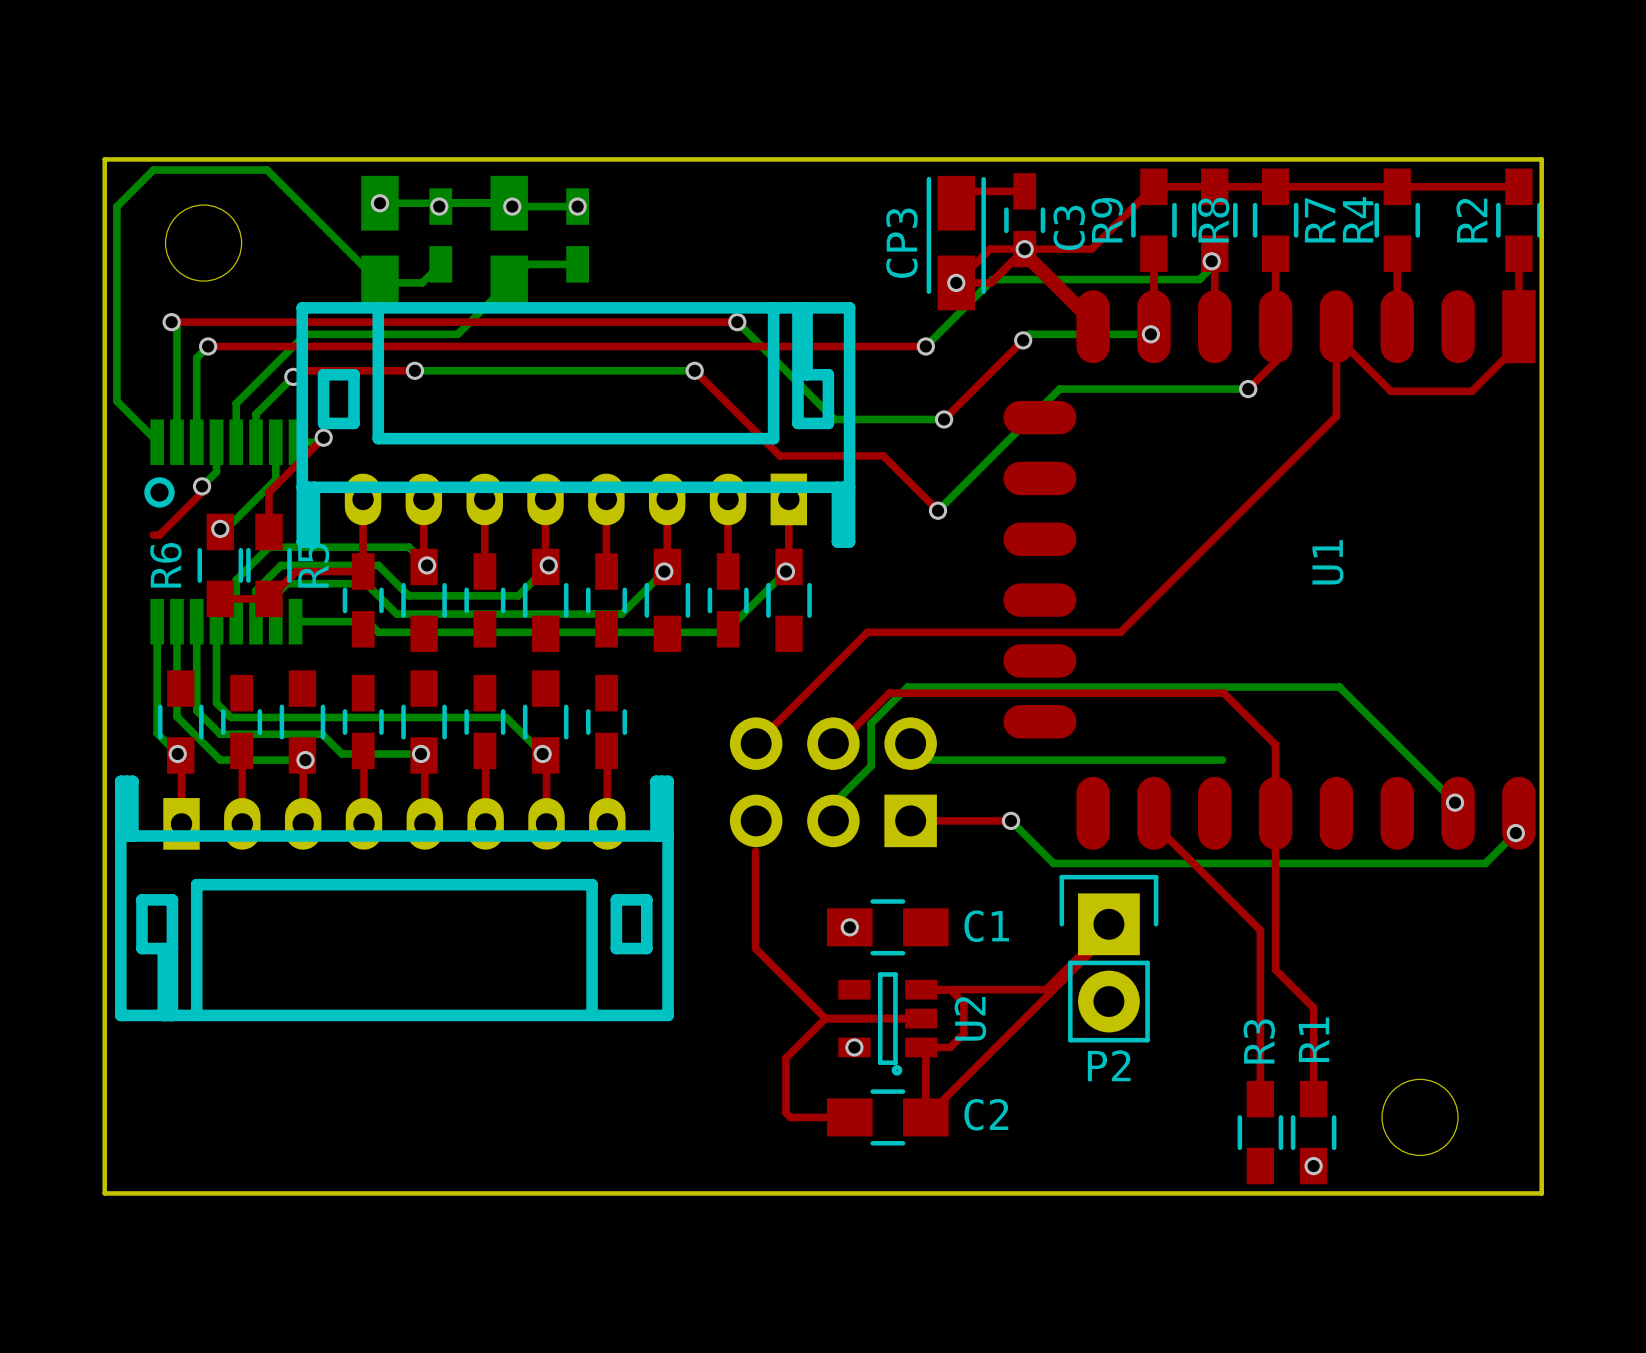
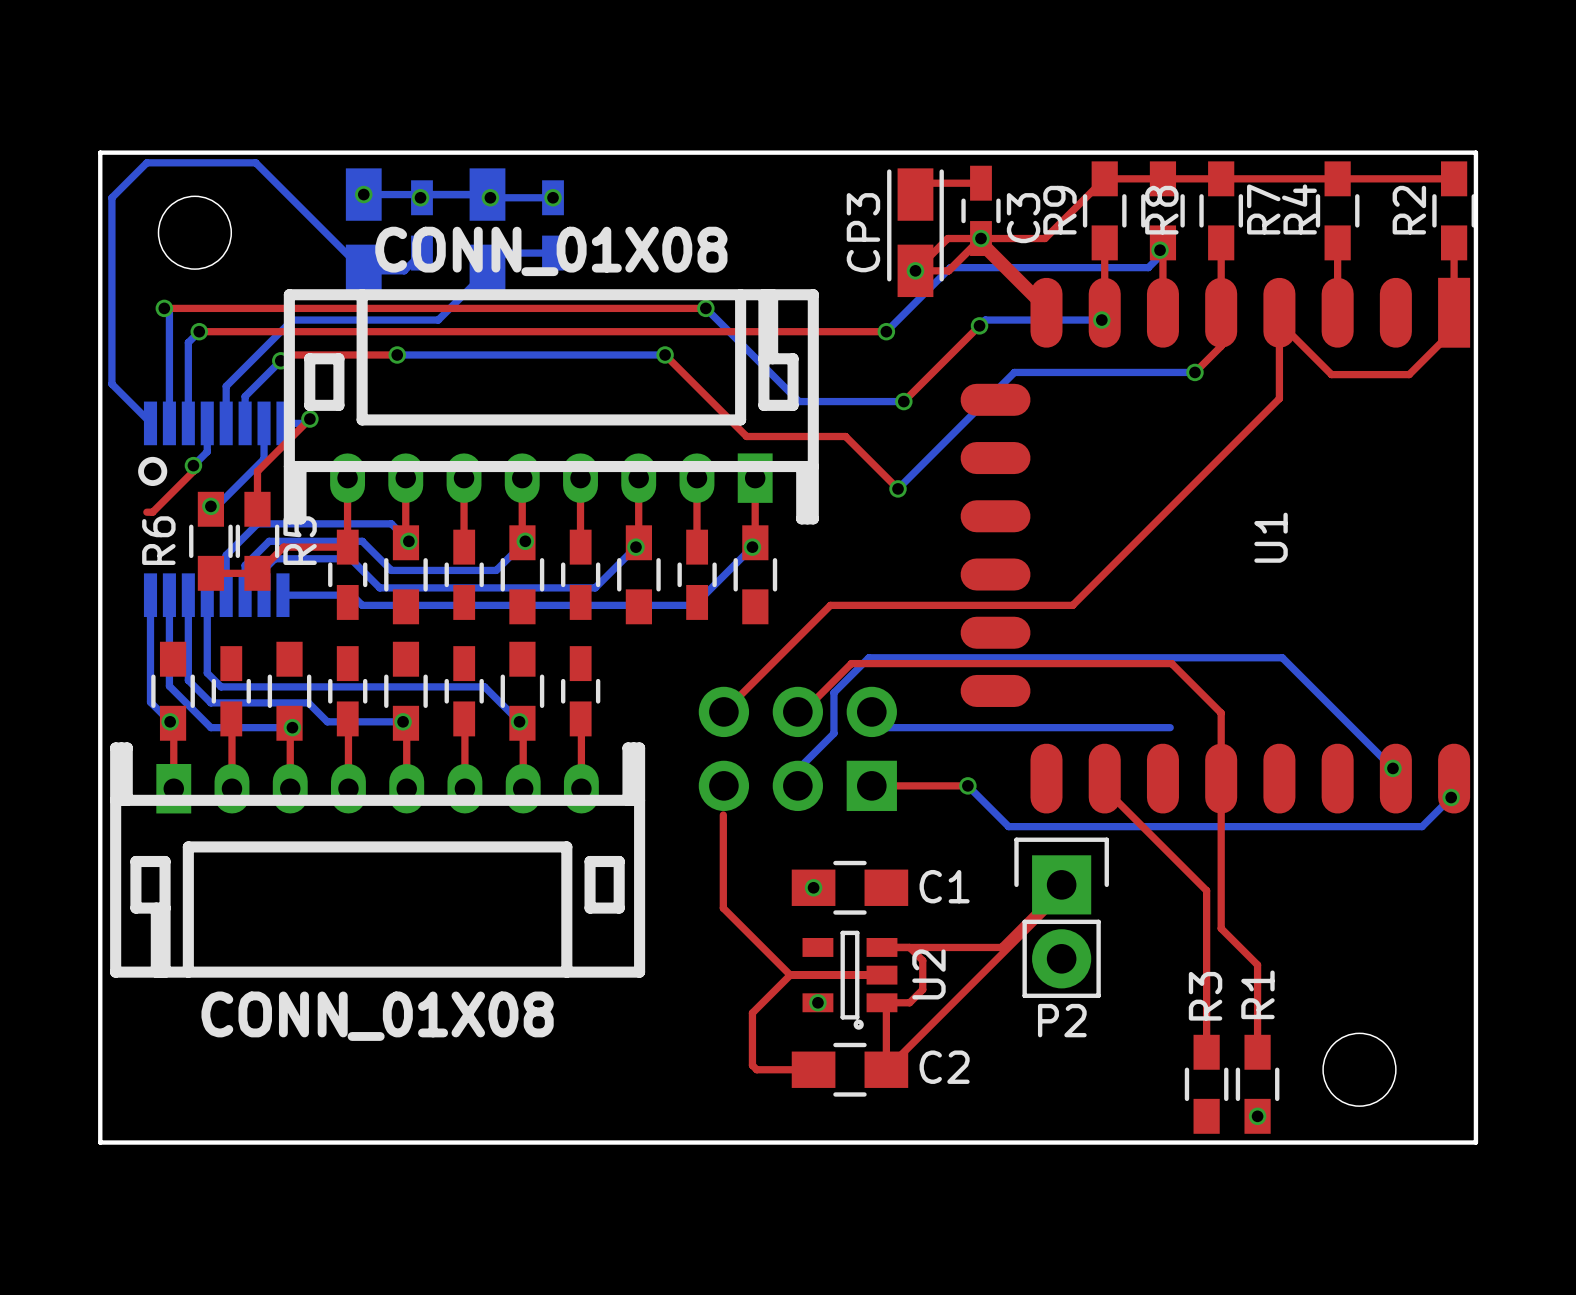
part value: none -> CONN_01X08 (551, 251)
part value: none -> CONN_01X08 (377, 1016)

